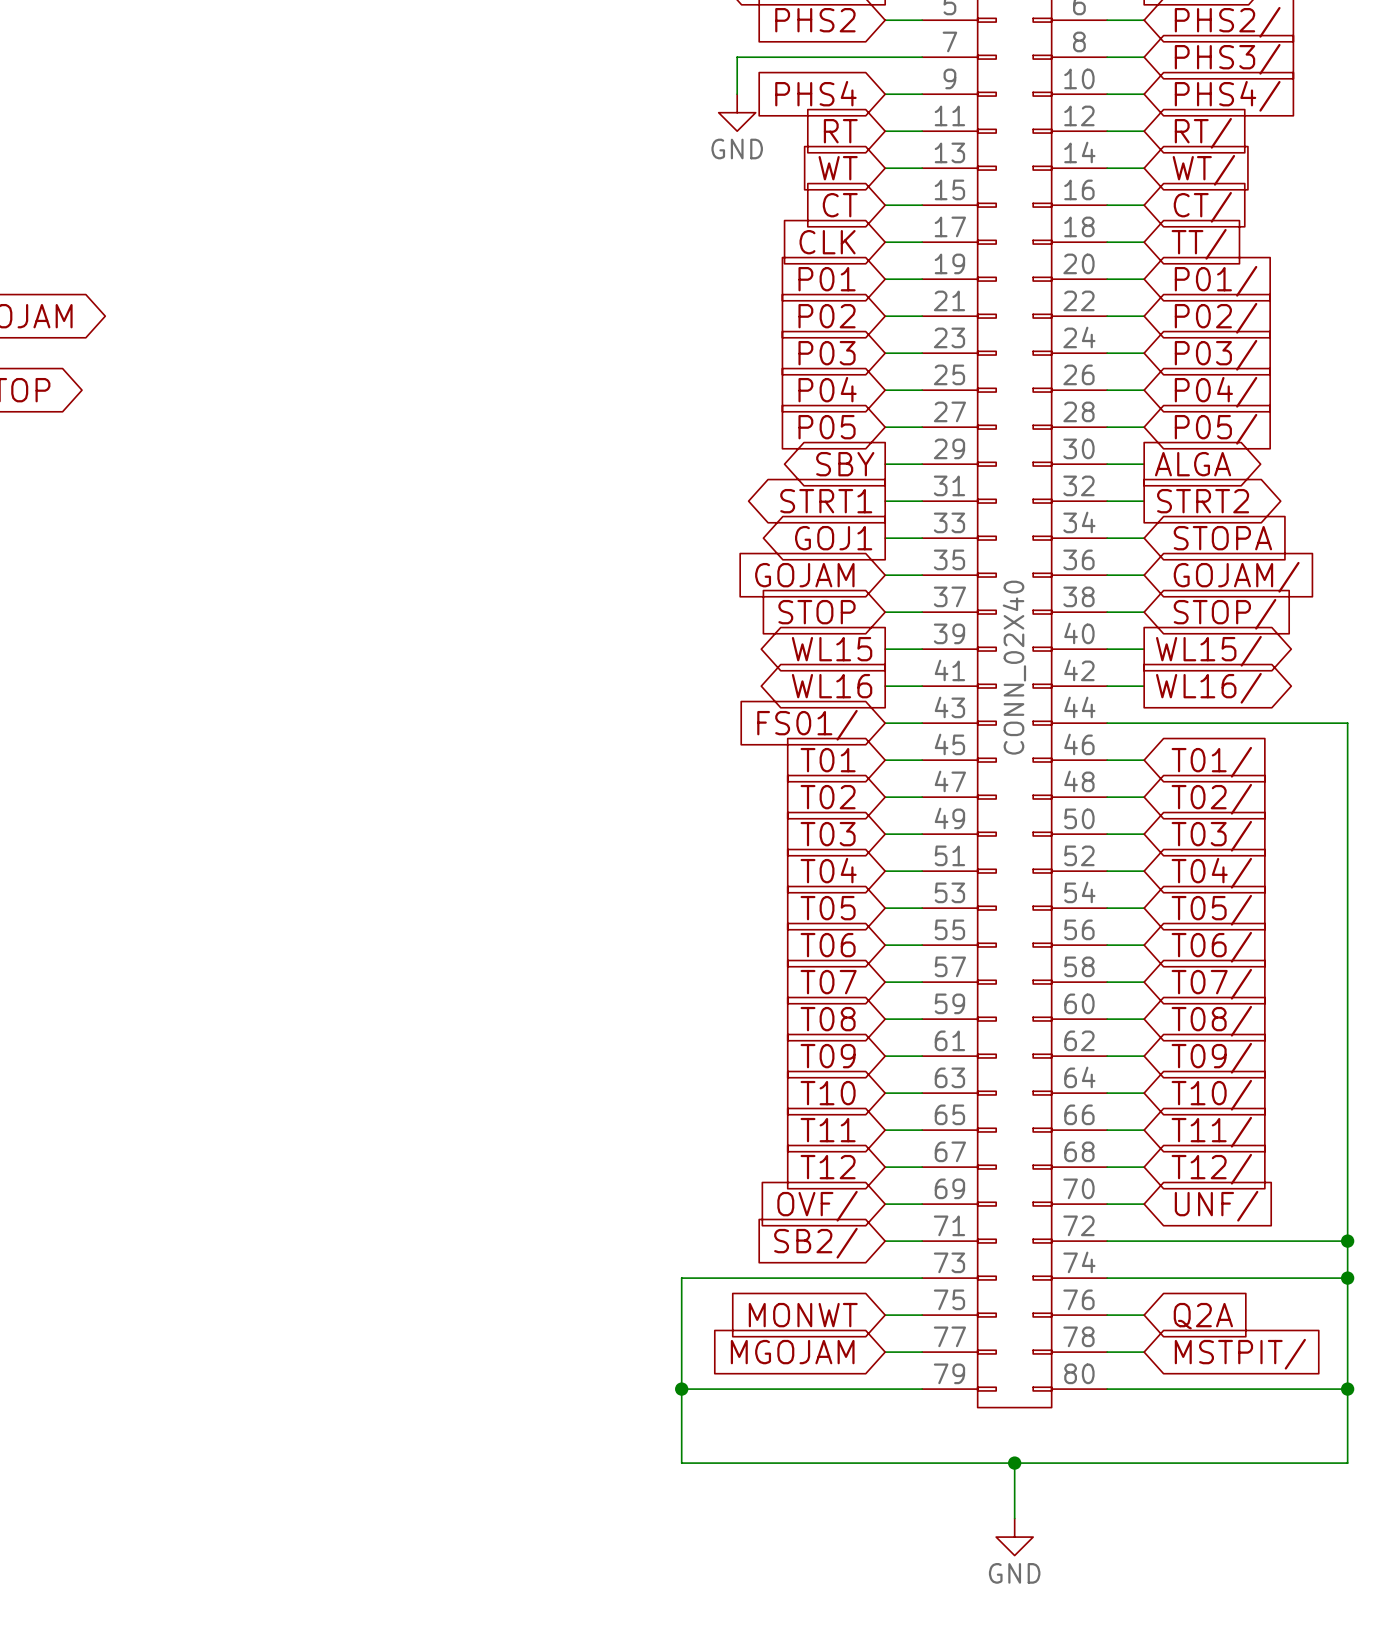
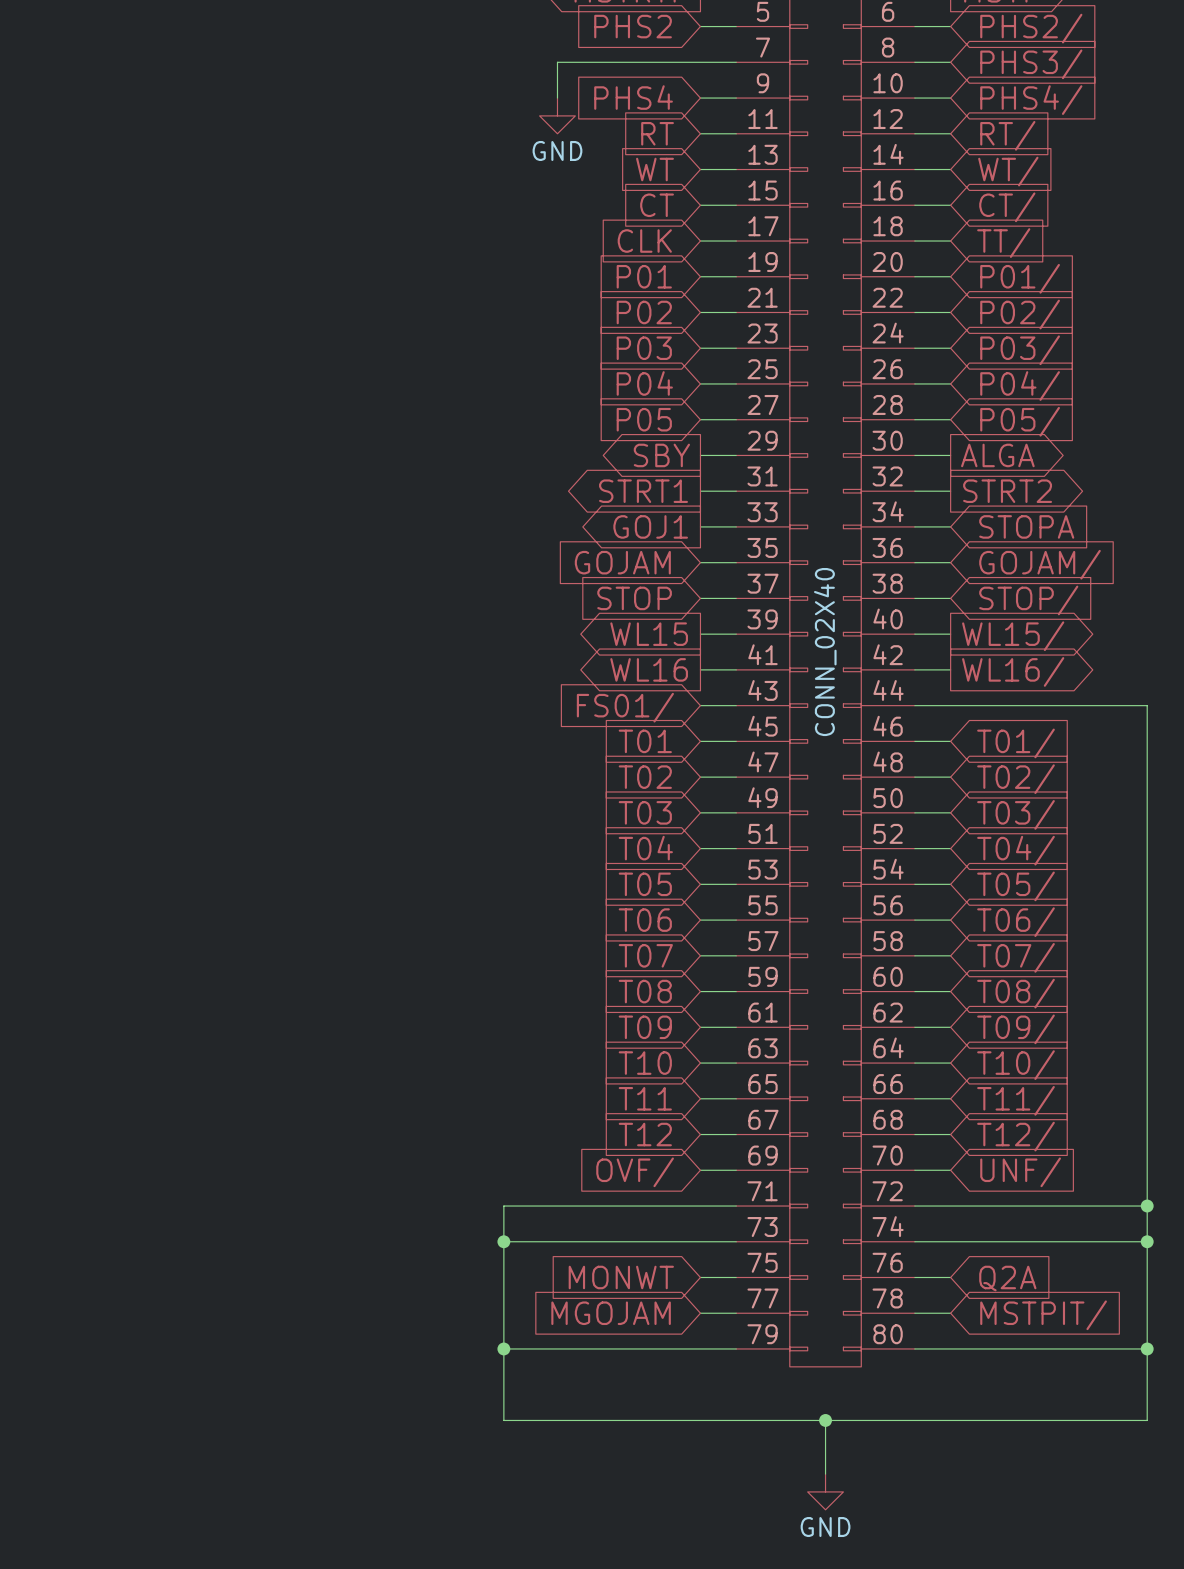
wire: none -> (700, 1206) (503, 1206) (503, 1241)
global label: SB2/ (815, 1243) -> none
junction: none -> (503, 1241)

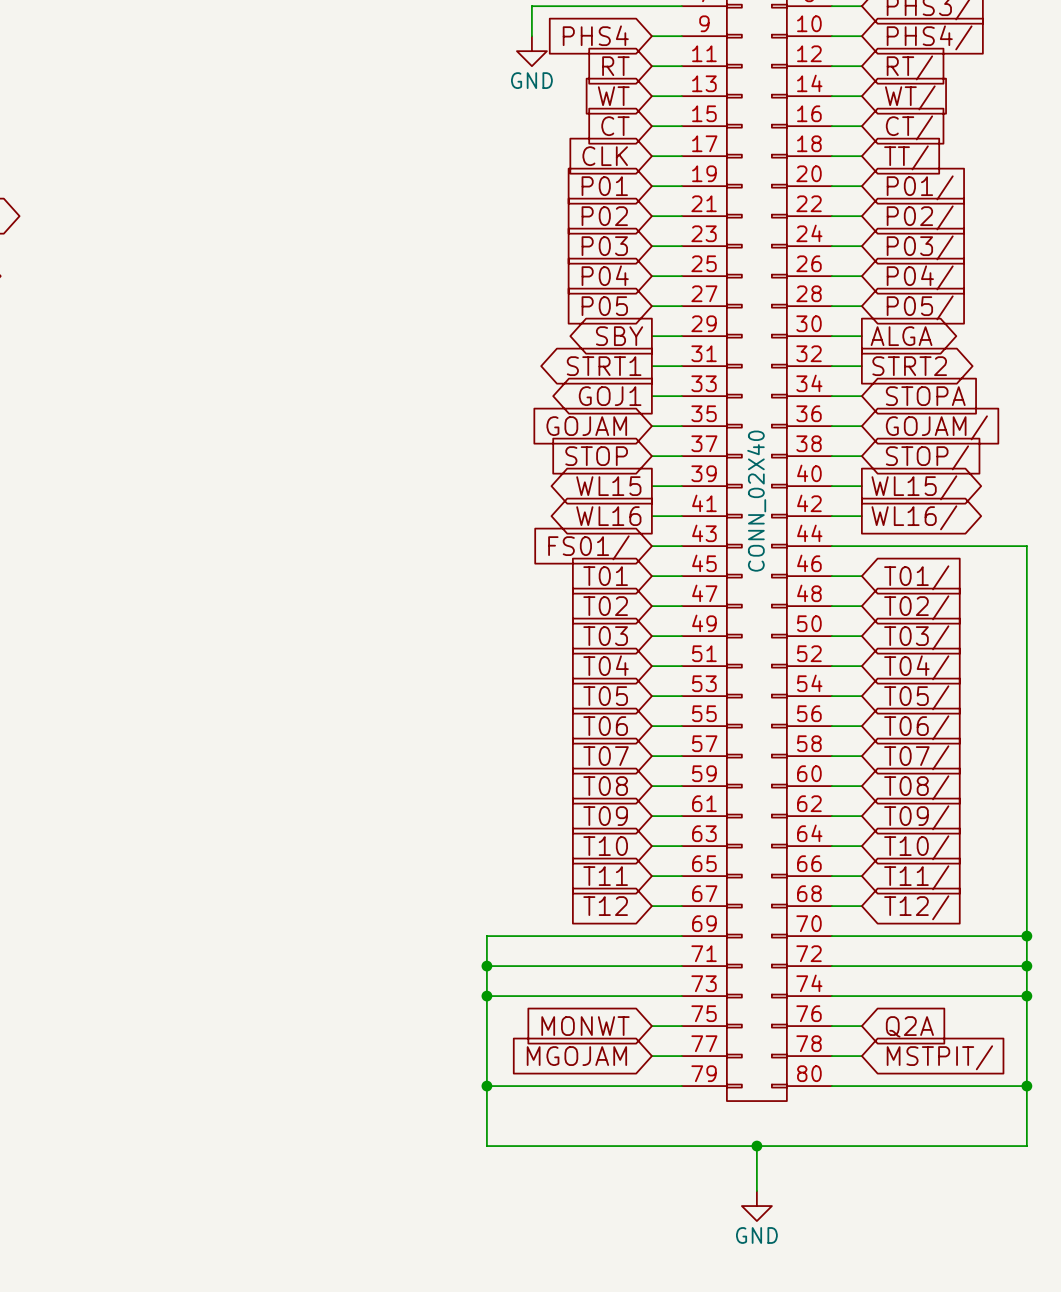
wire: none -> (651, 936) (486, 936) (486, 966)
wire: none -> (861, 936) (1026, 936)
junction: none -> (1026, 936)
global label: OVF/ (635, 1172) -> none
global label: UNF/ (1020, 1172) -> none
junction: none -> (486, 966)

